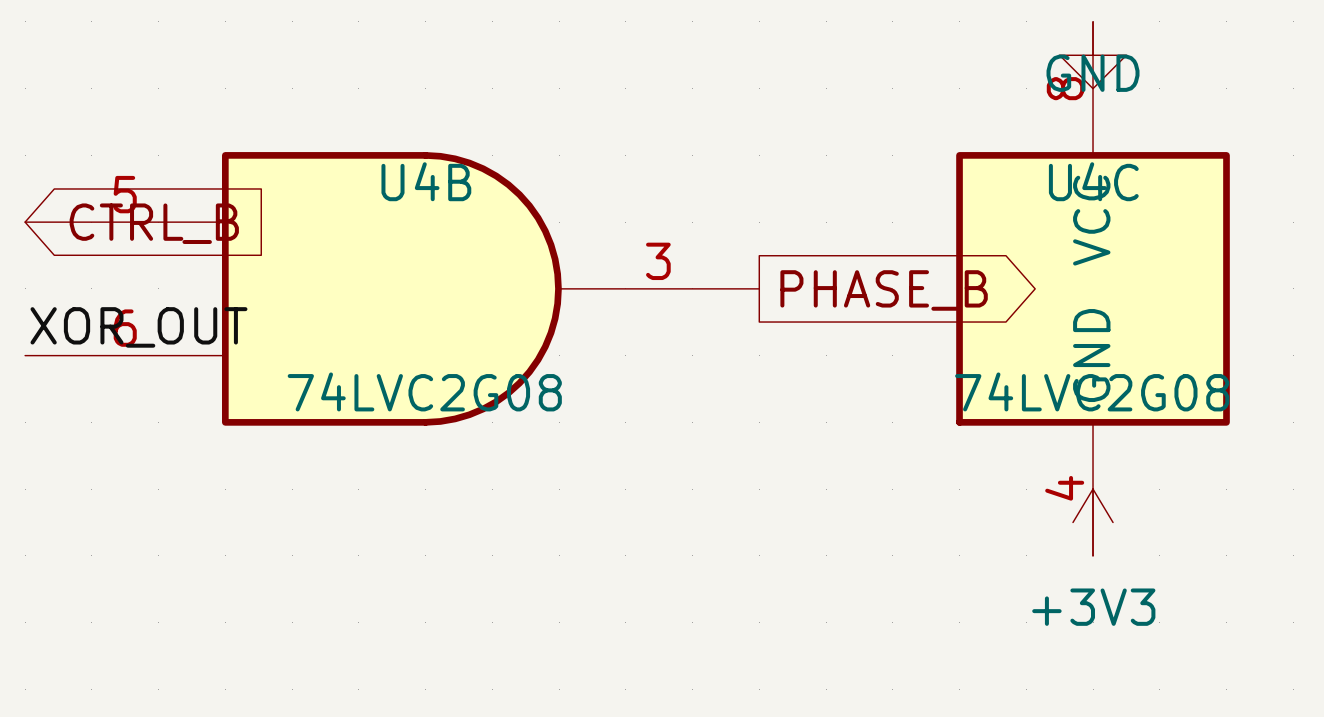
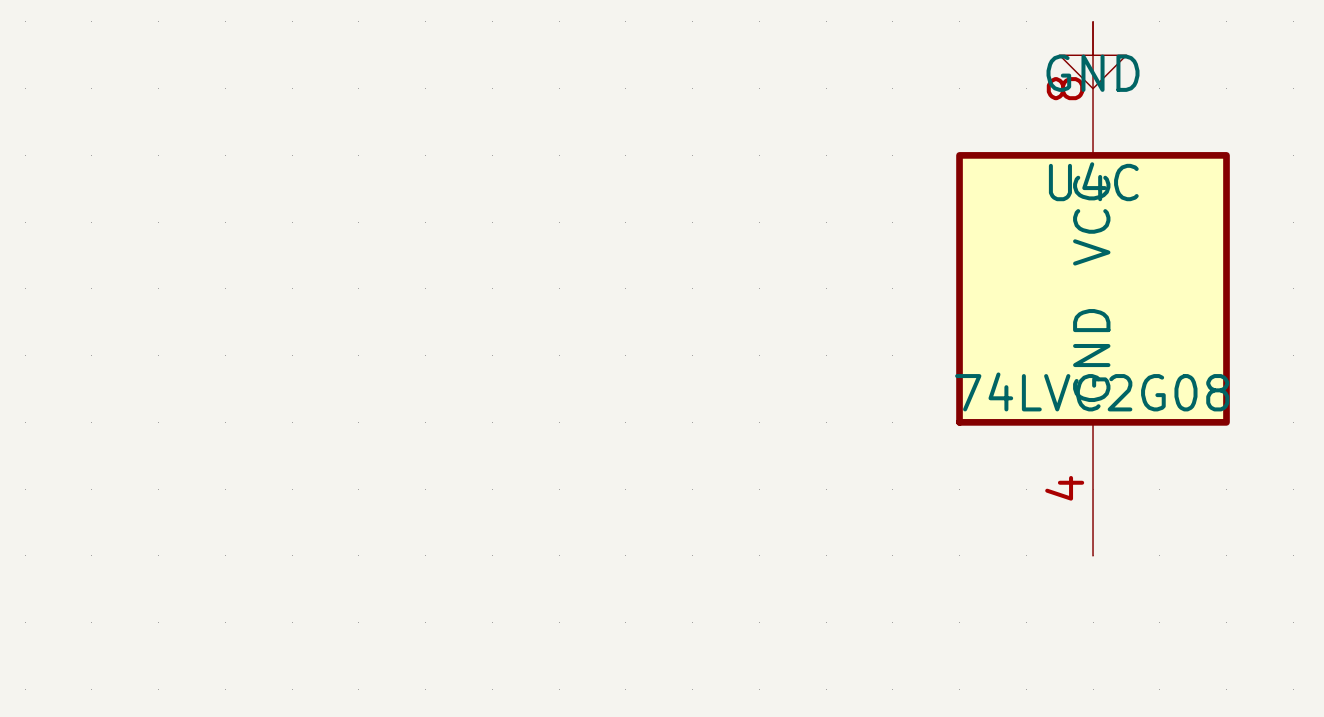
global label: CTRL_B (154, 223) -> none
U4B: 74LVC2G08 (392, 288) -> none
global label: PHASE_B (884, 290) -> none
label: XOR_OUT (138, 327) -> none
power symbol: +3V3 (1093, 522) -> none

